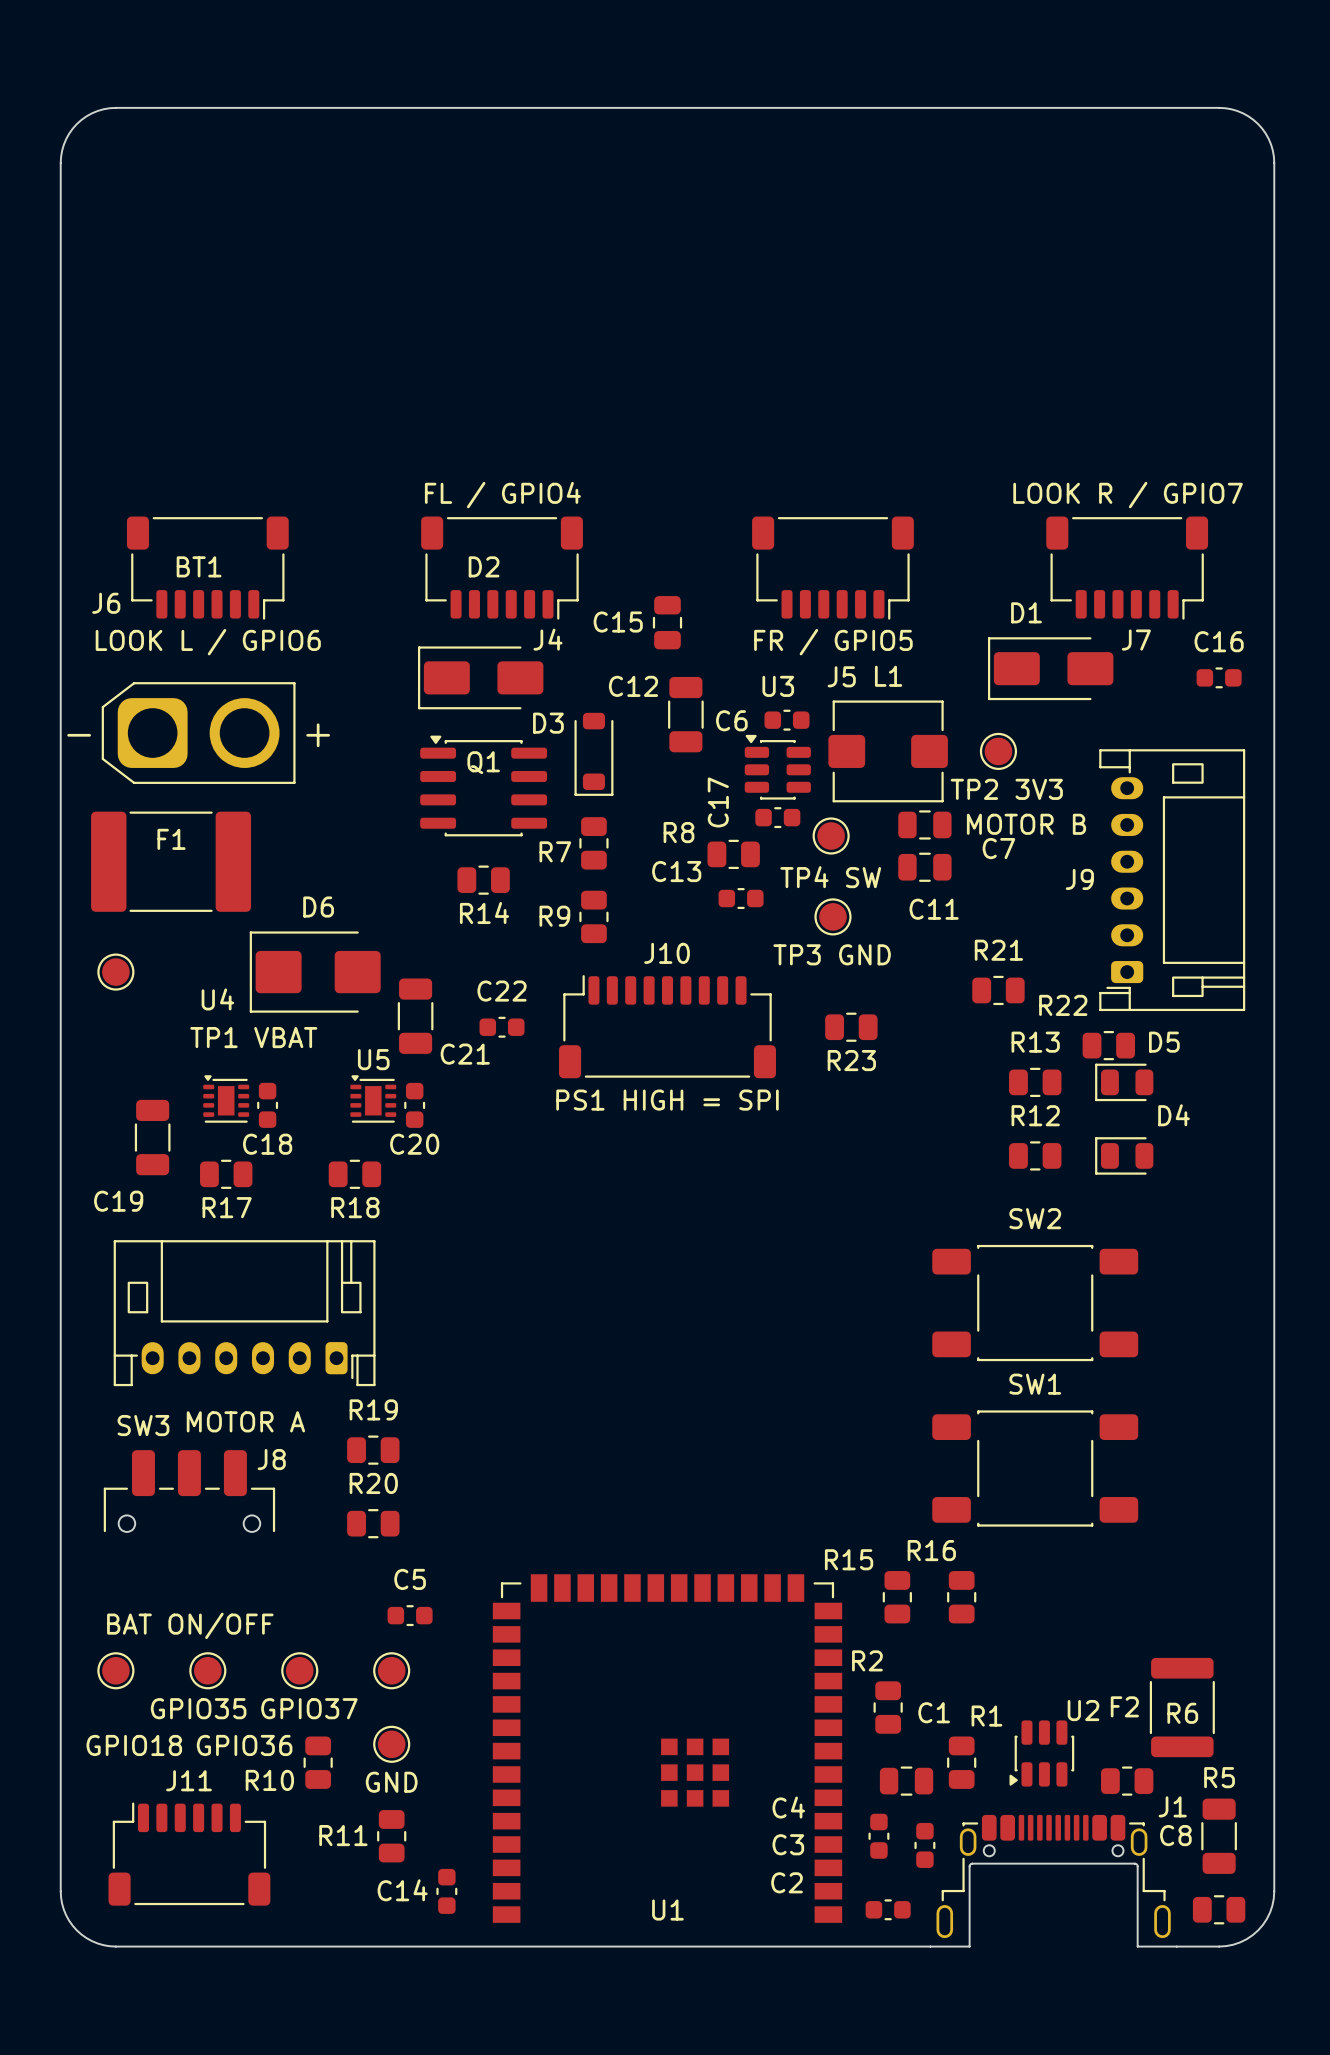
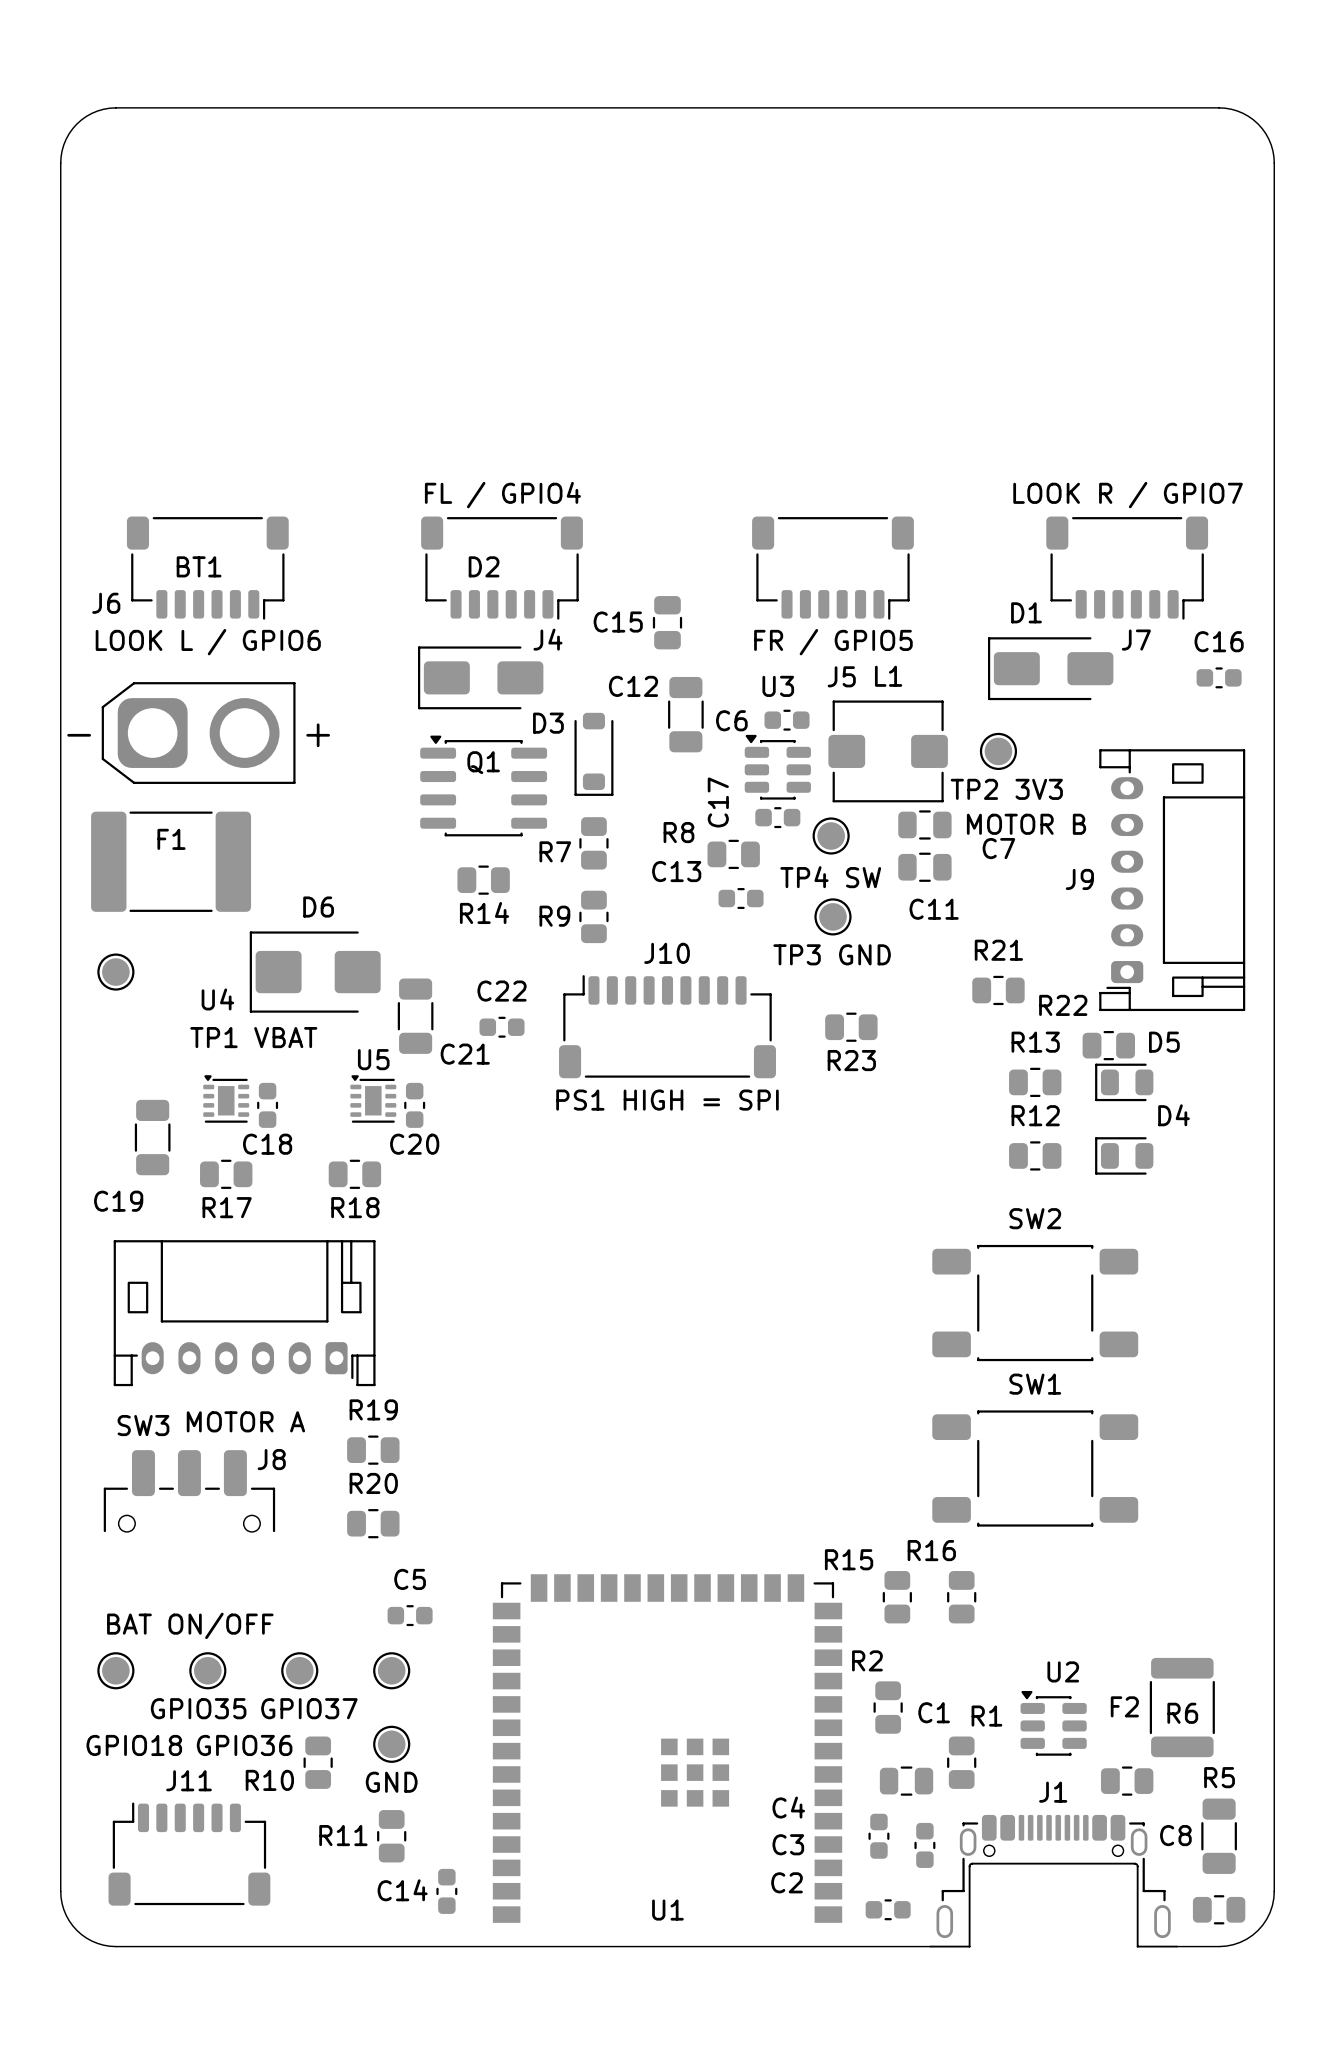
U2 rotation: 0° (1041, 1753) -> 90° clockwise (1053, 1723)
J1 name position: J1 (1172, 1806) -> J1 (1053, 1792)

